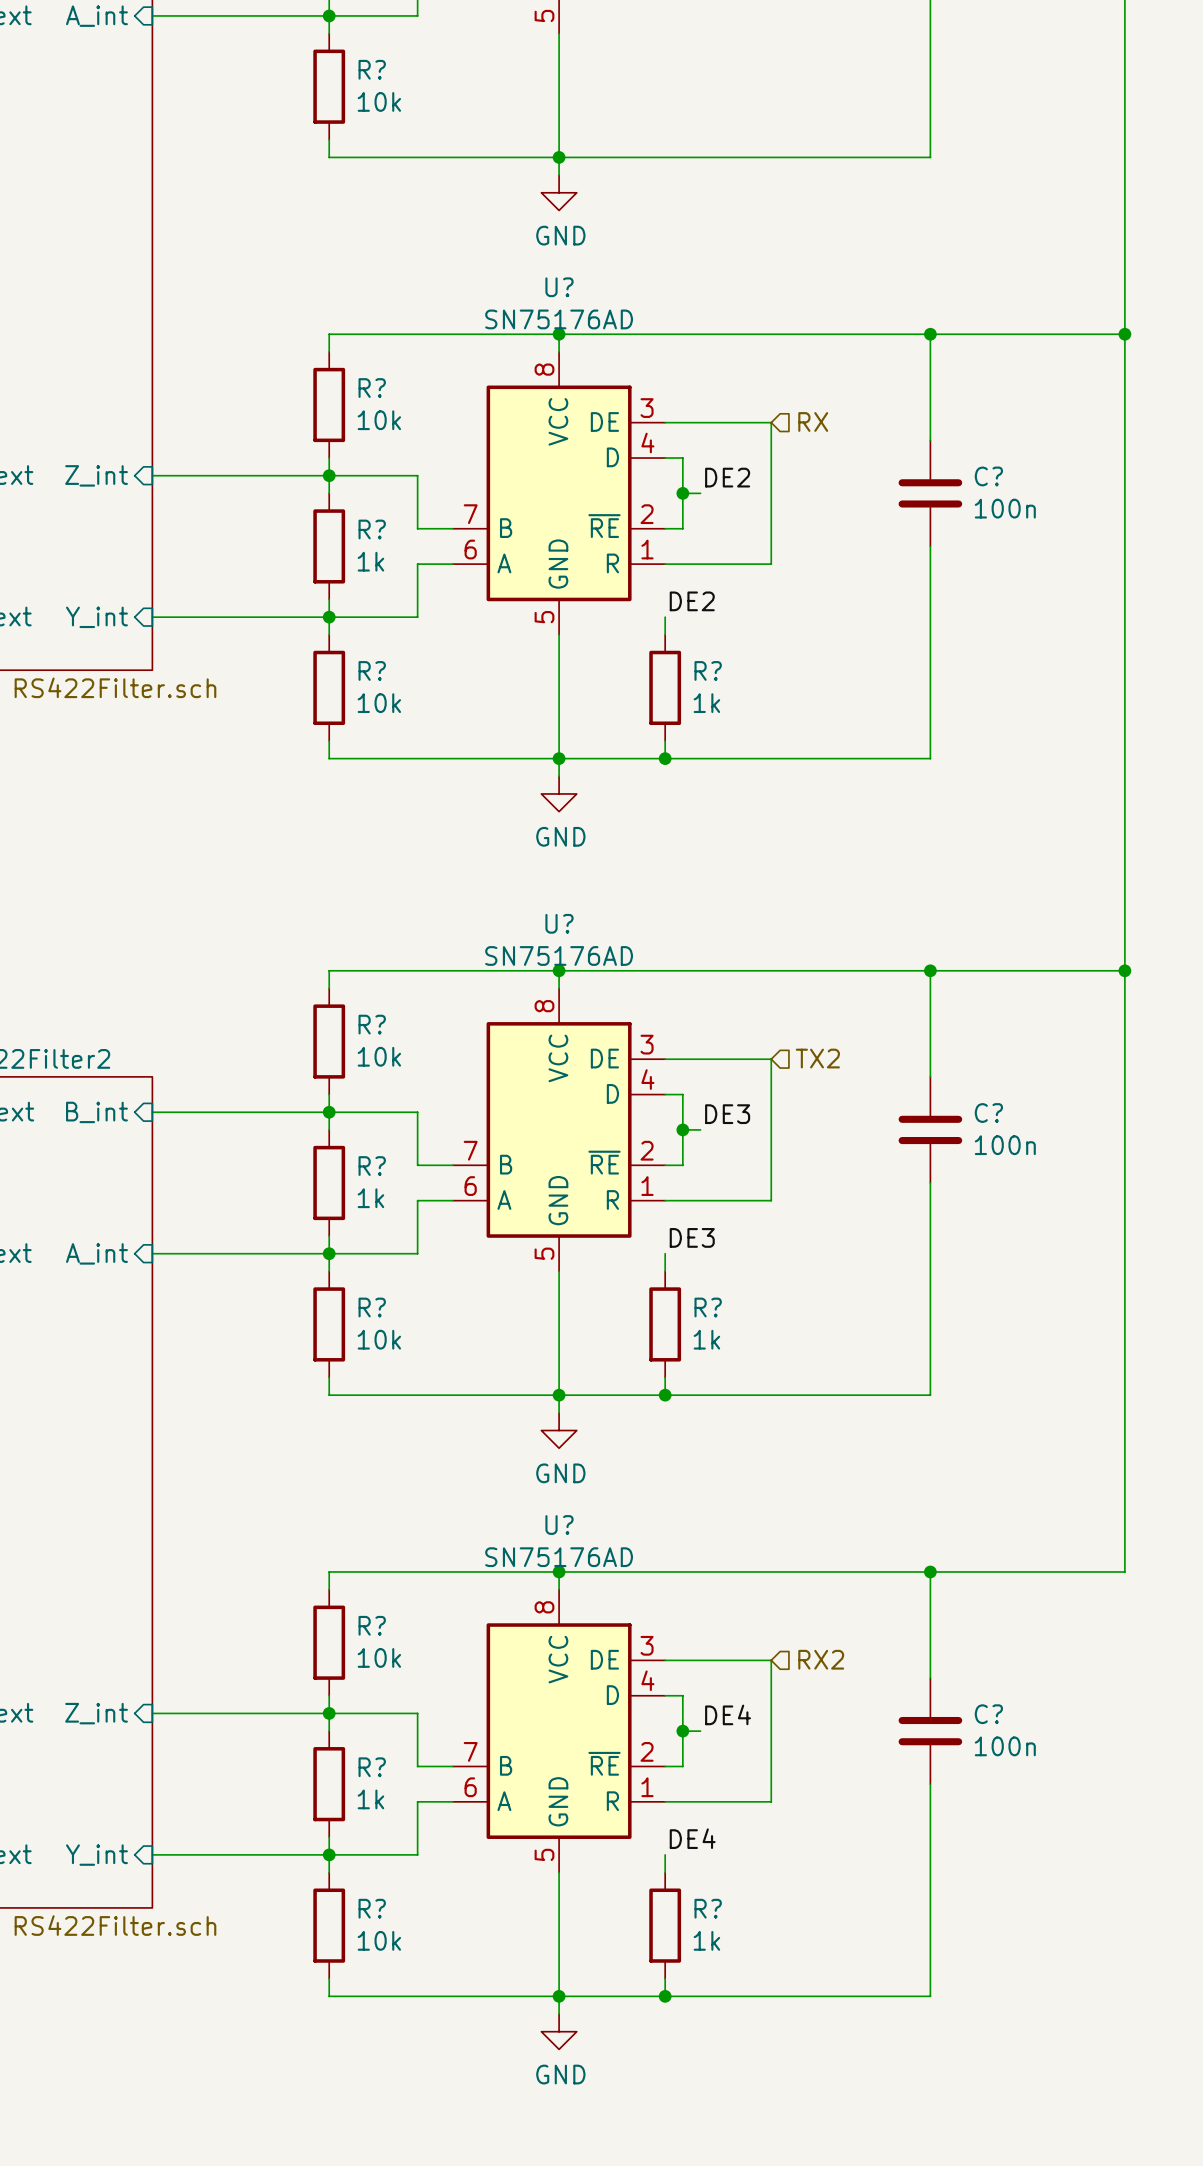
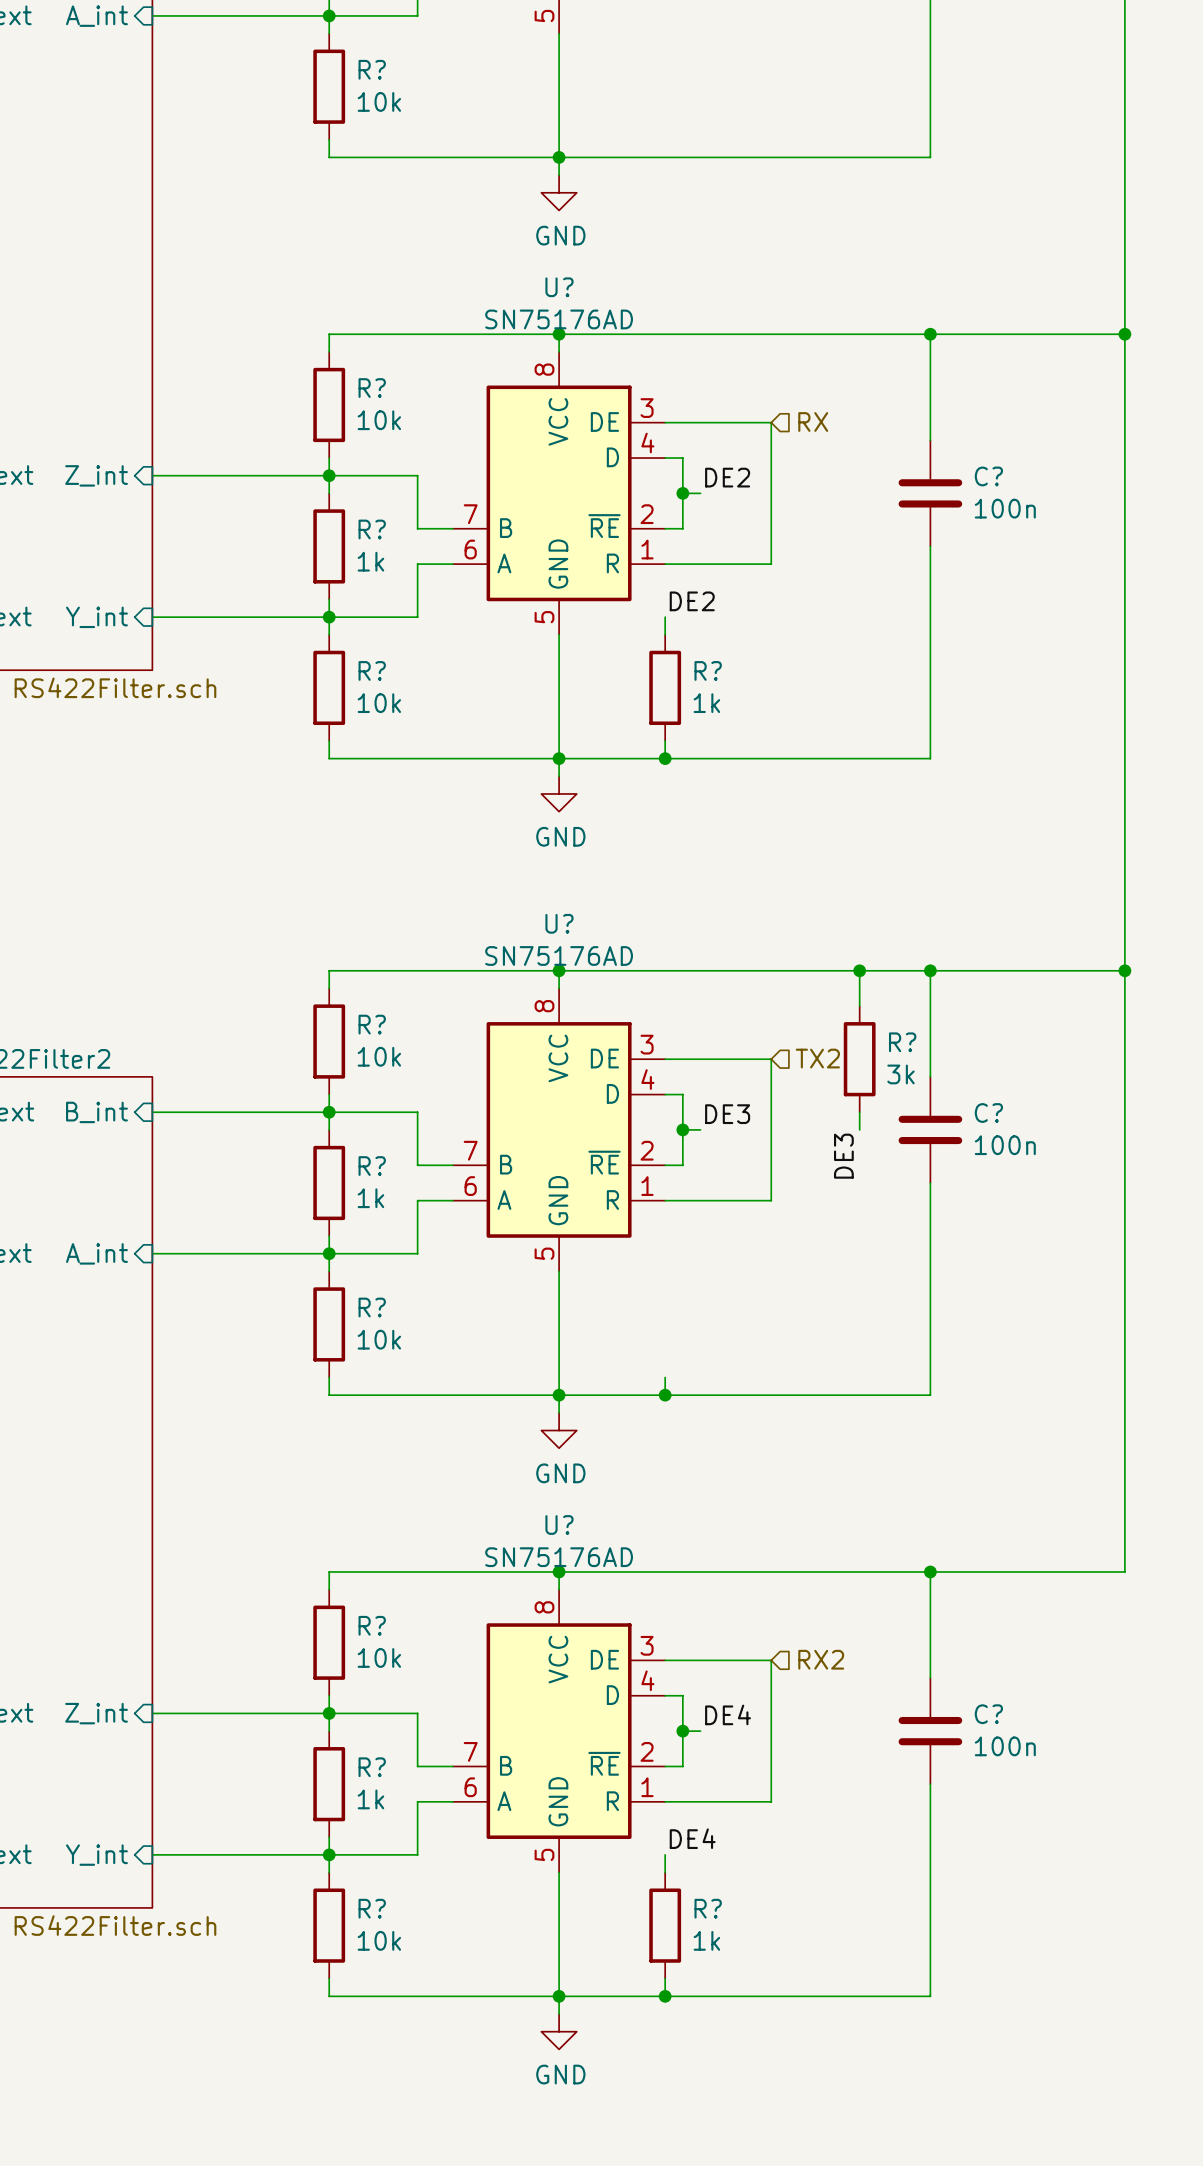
wire: none -> (859, 970) (859, 1006)
junction: none -> (859, 970)
R?: none -> 3k (859, 1059)
label rotation: 0° (692, 1237) -> 90° counterclockwise (843, 1156)
label position: DE3 (692, 1237) -> DE3 (843, 1156)
wire: (665, 1253) (665, 1271) -> (859, 1112) (859, 1129)
R?: 1k (665, 1324) -> none

